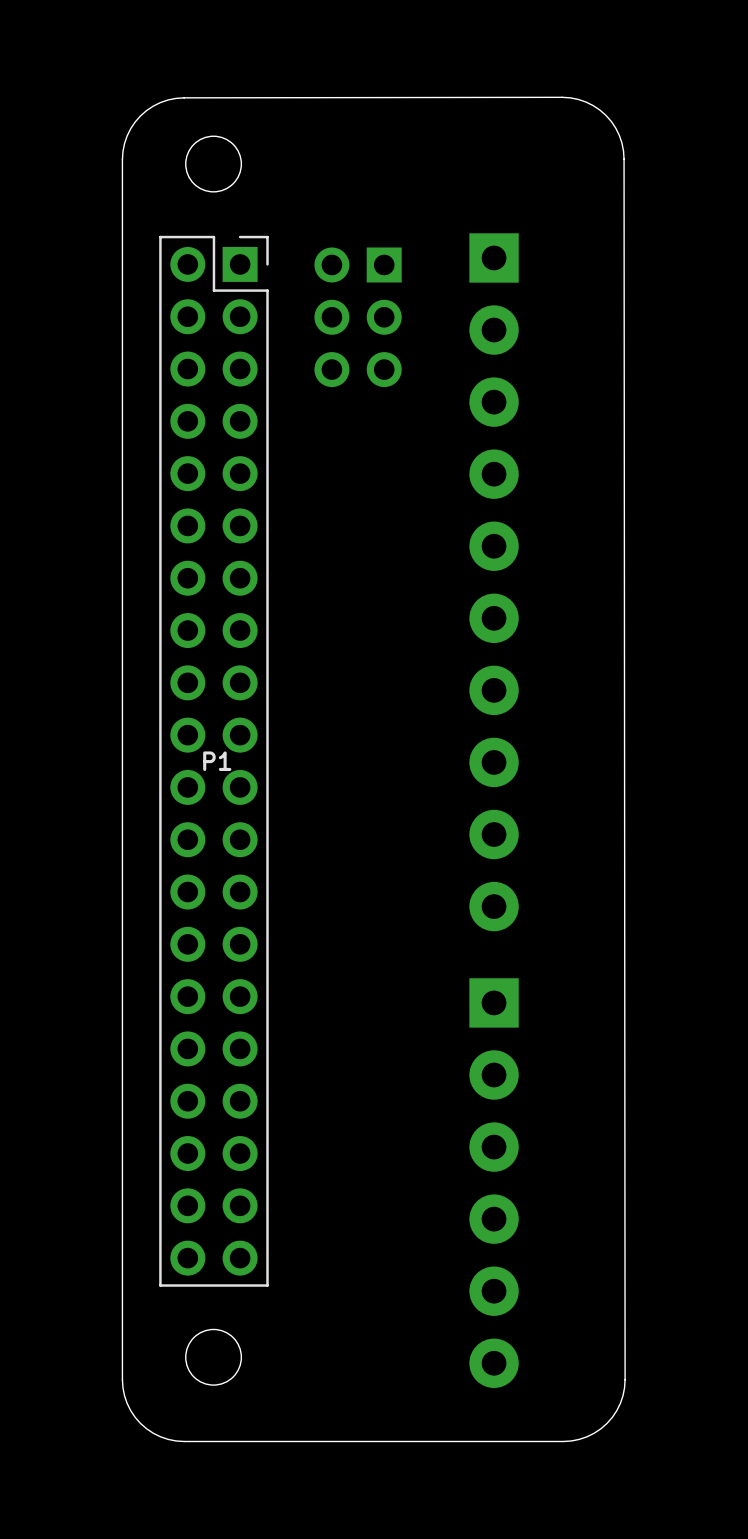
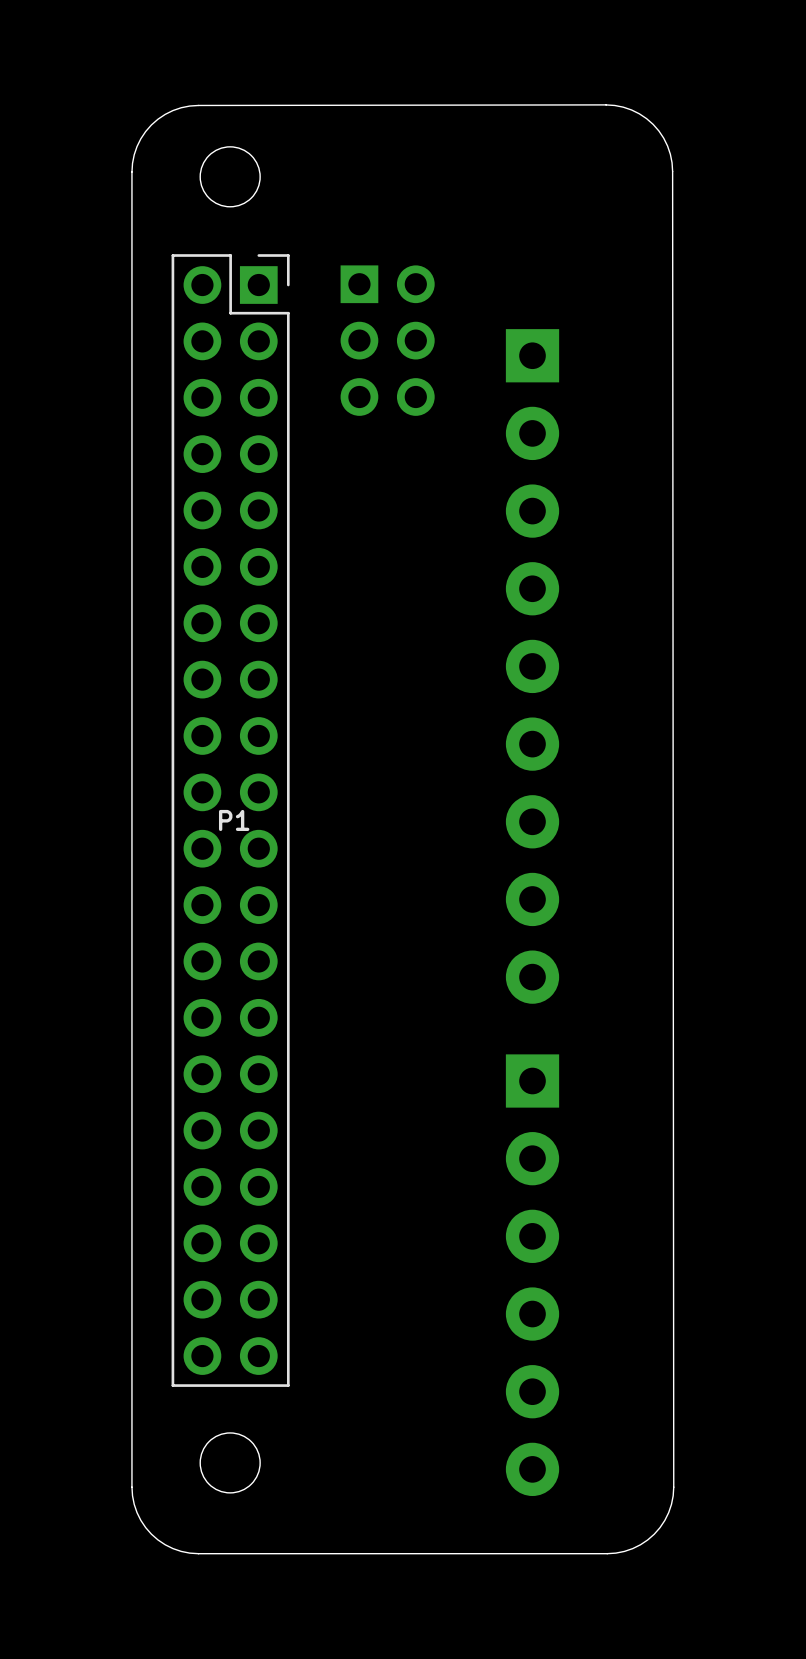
part footprint: [314, 247, 402, 388] -> [340, 265, 435, 416]
part: (494, 582) -> none
part: none -> (532, 666)

